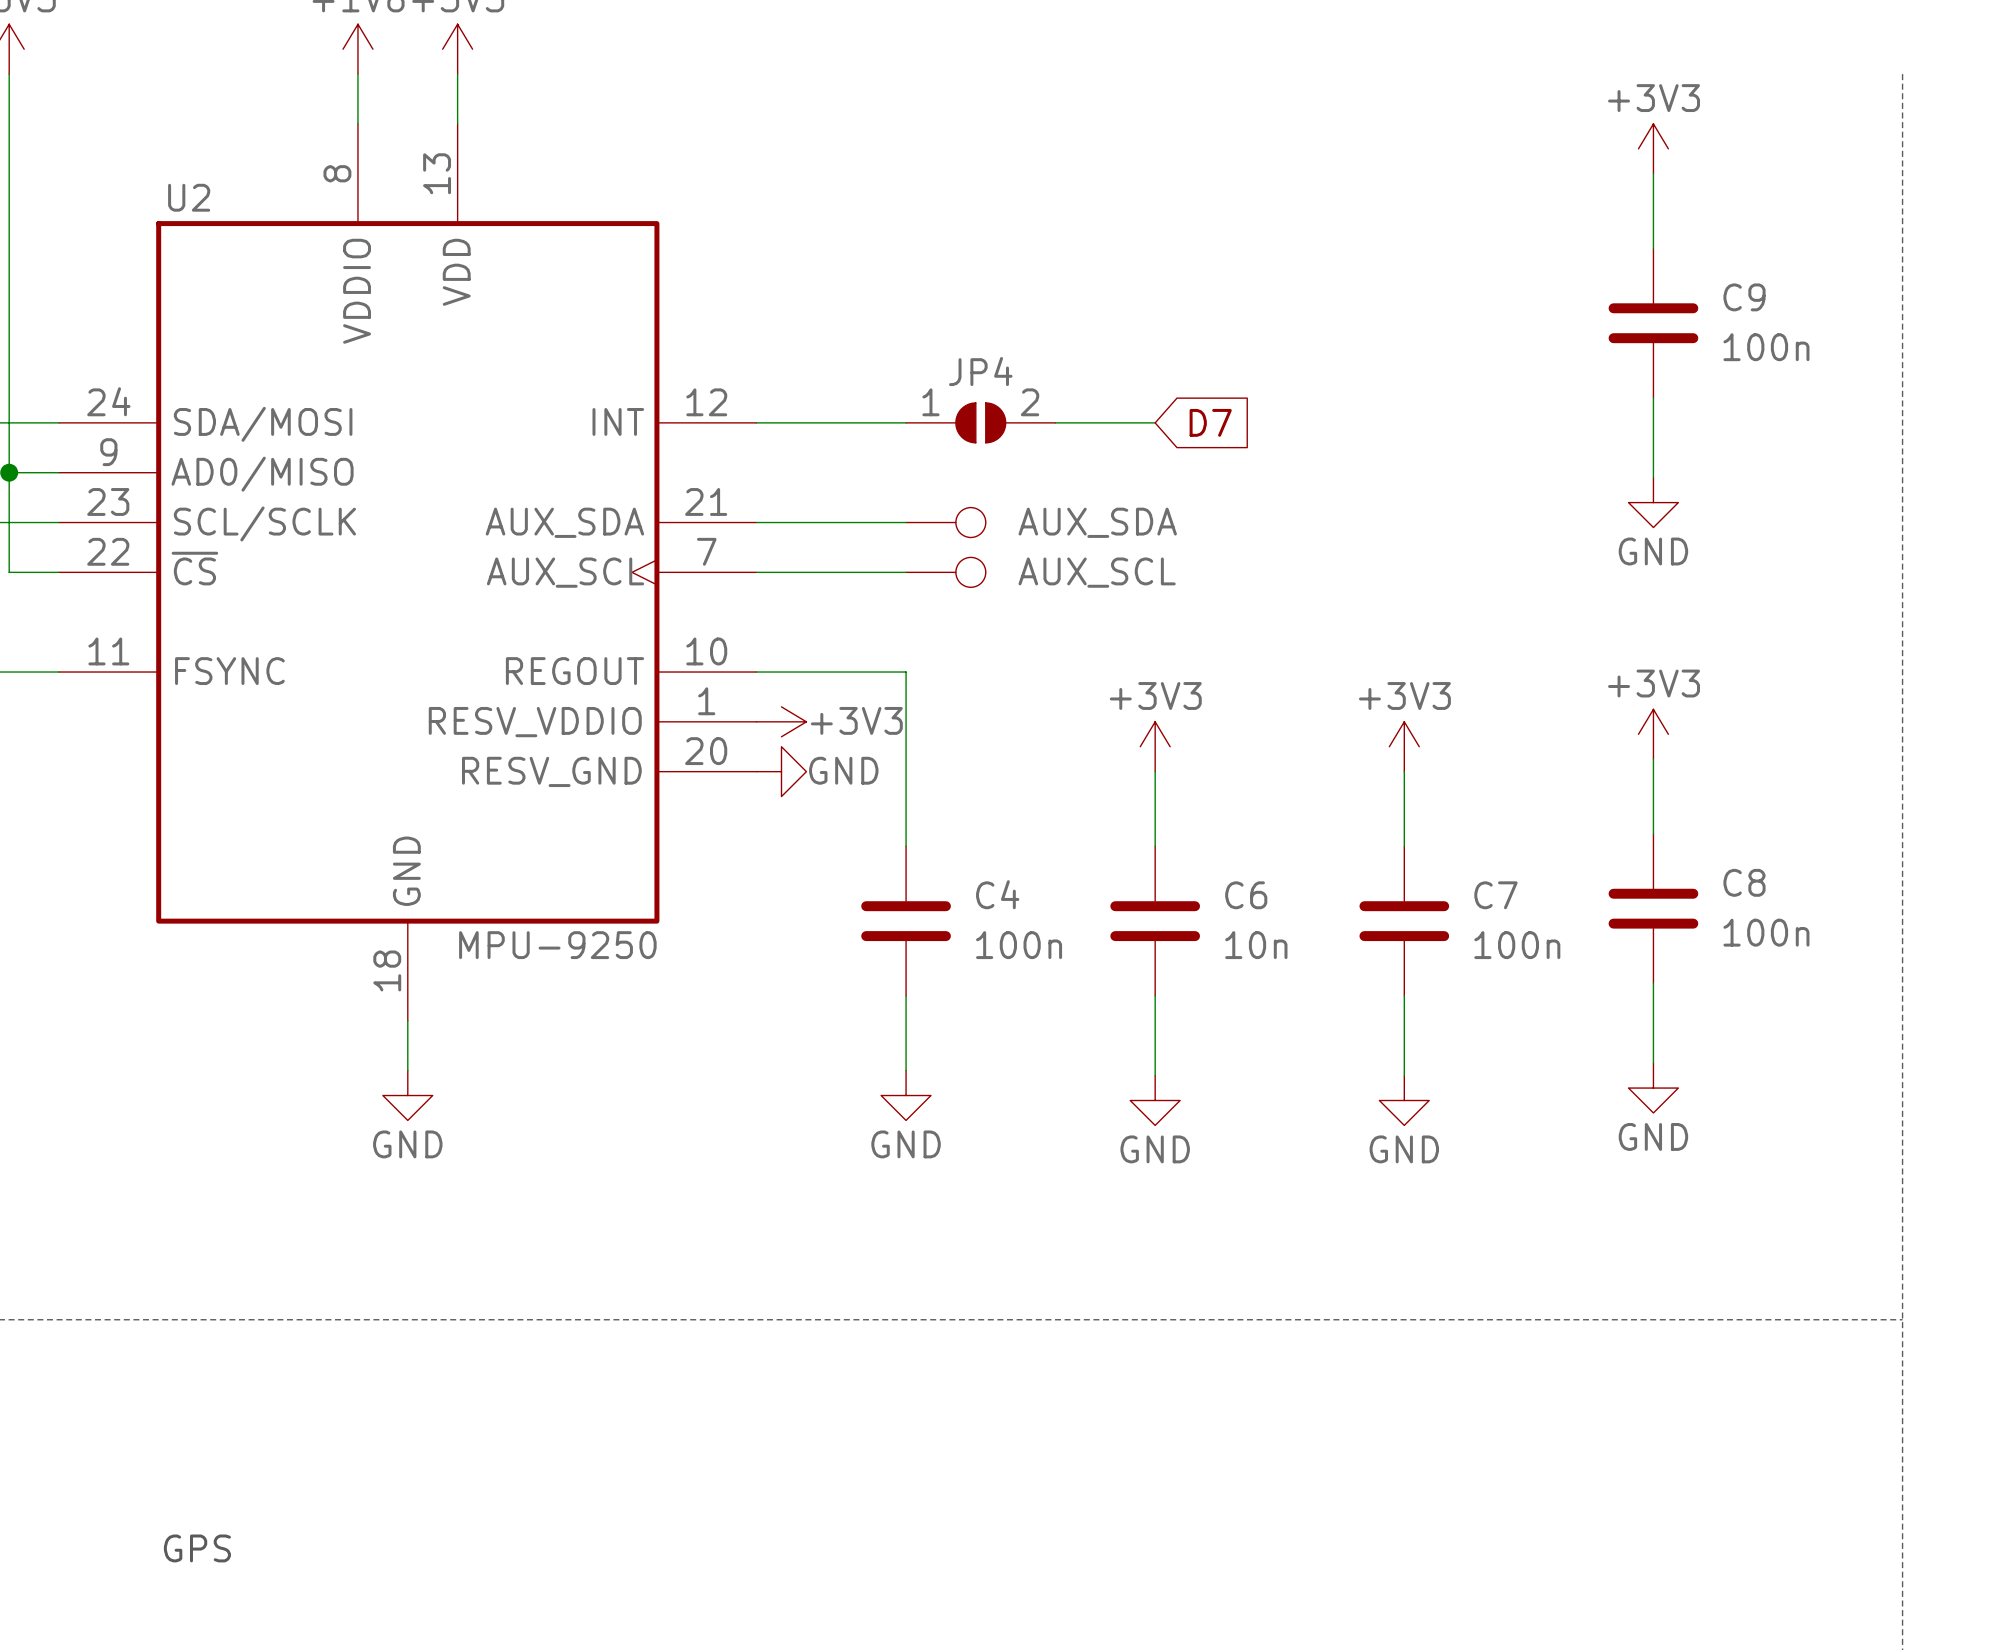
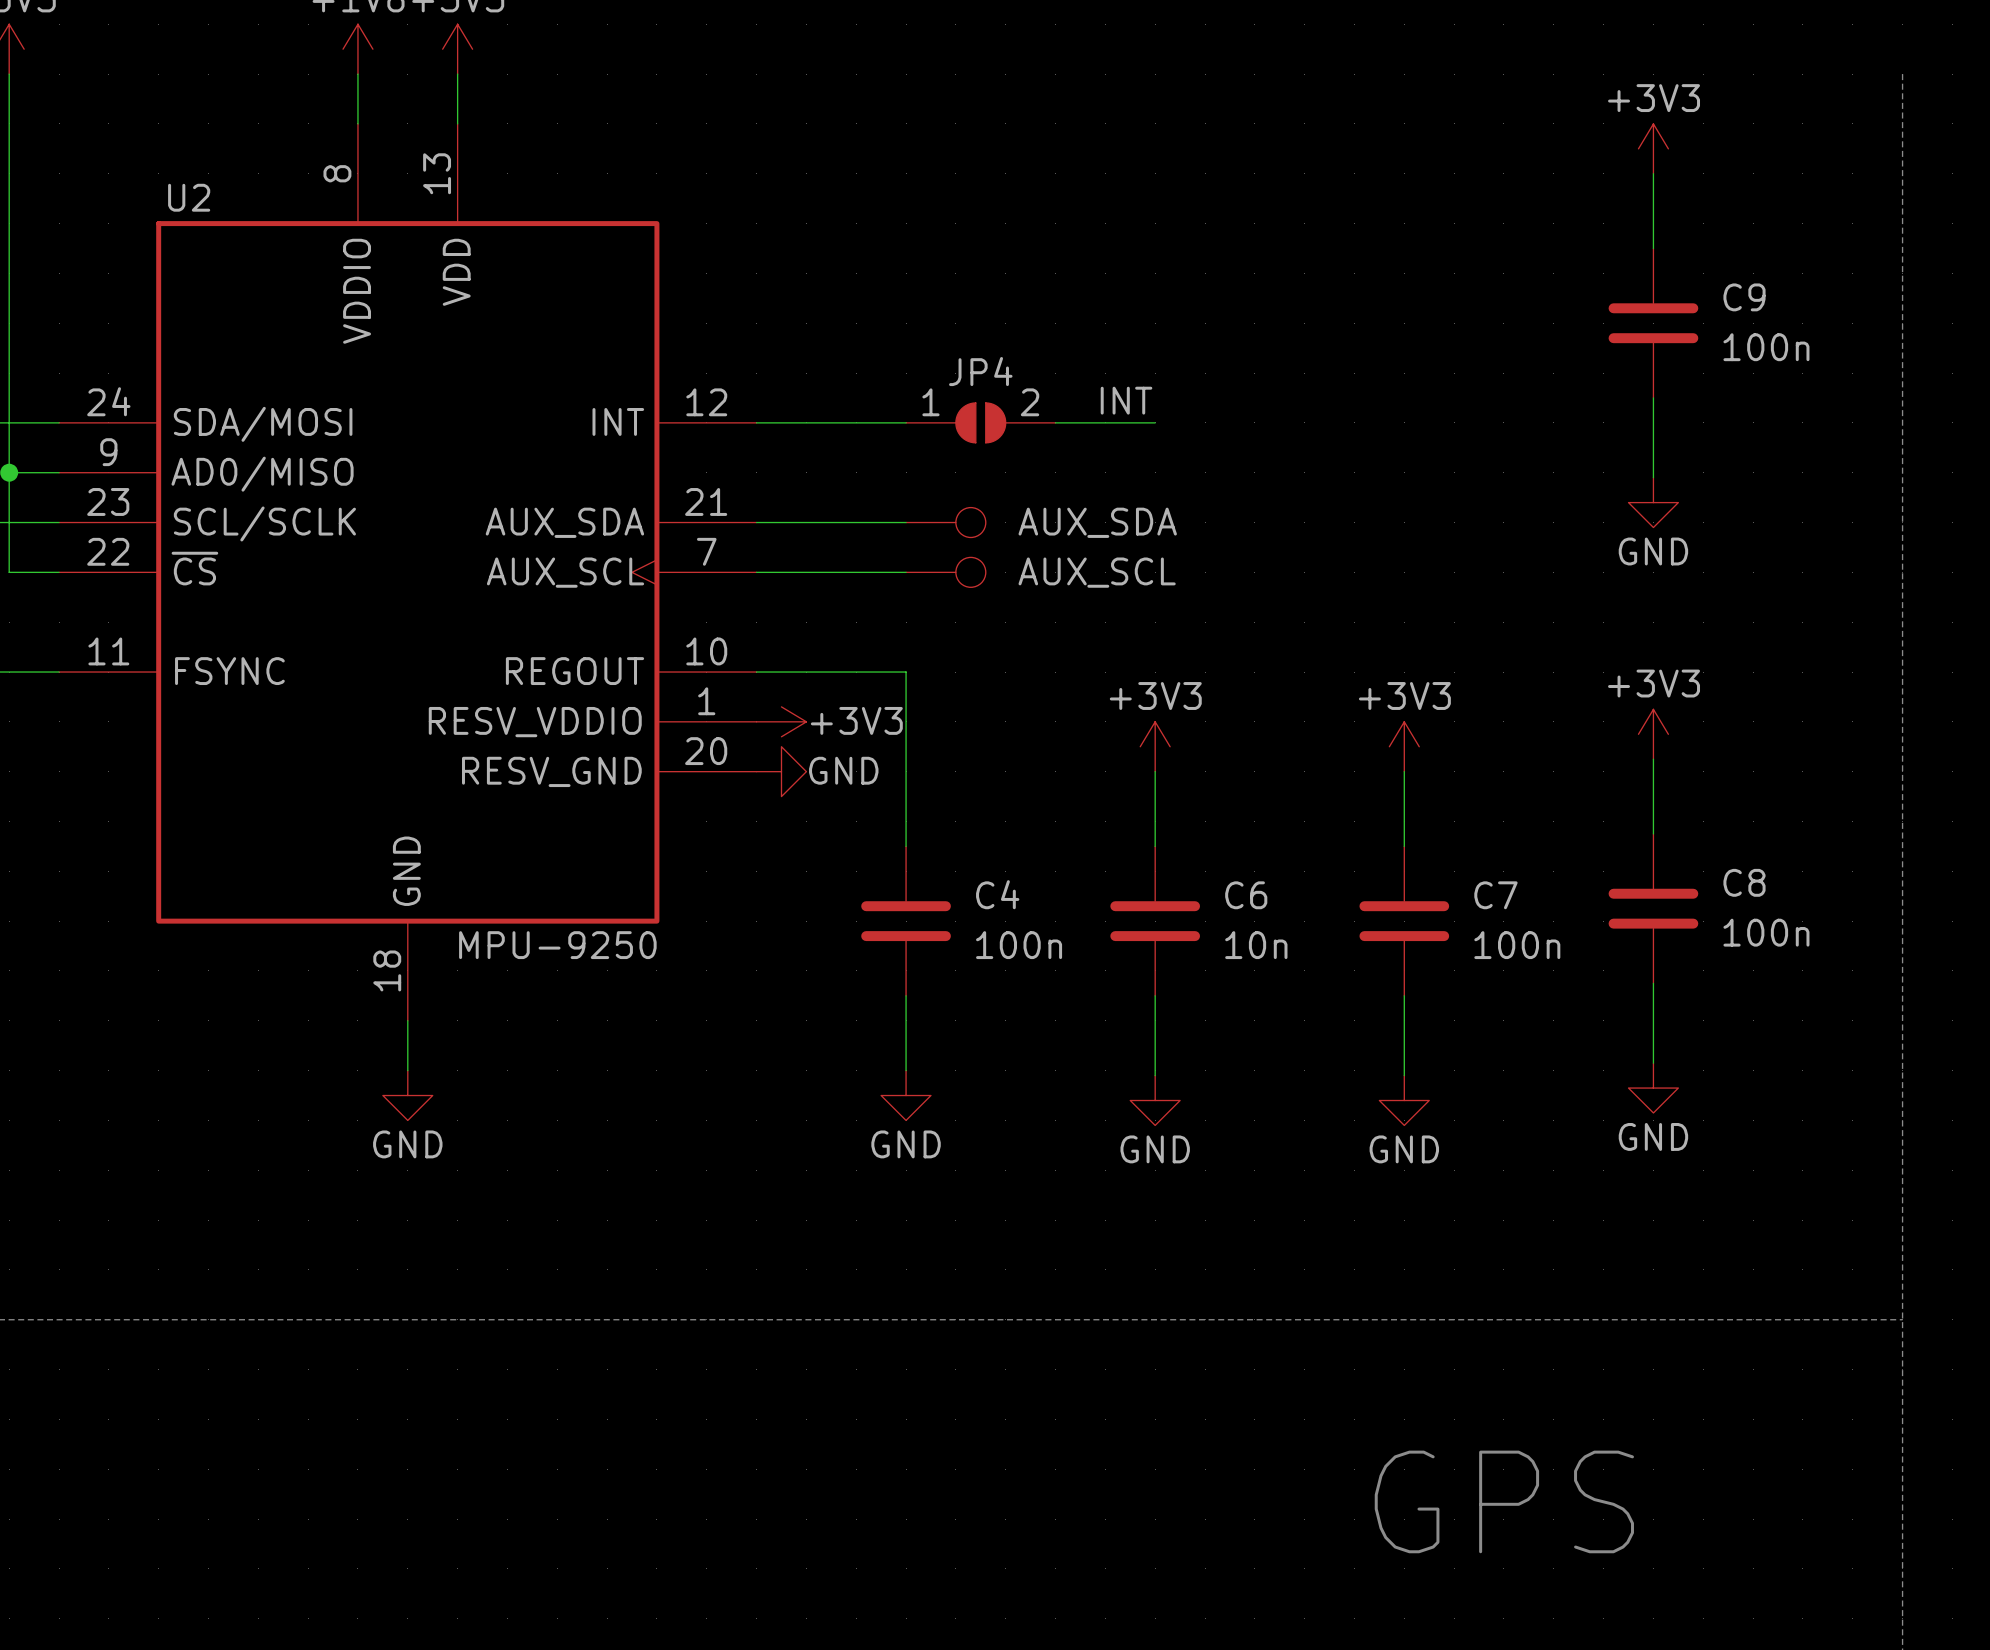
label: none -> INT (1126, 400)
global label: D7 (1210, 422) -> none
text: none -> GPS (1504, 1501)
text: GPS (197, 1548) -> none

